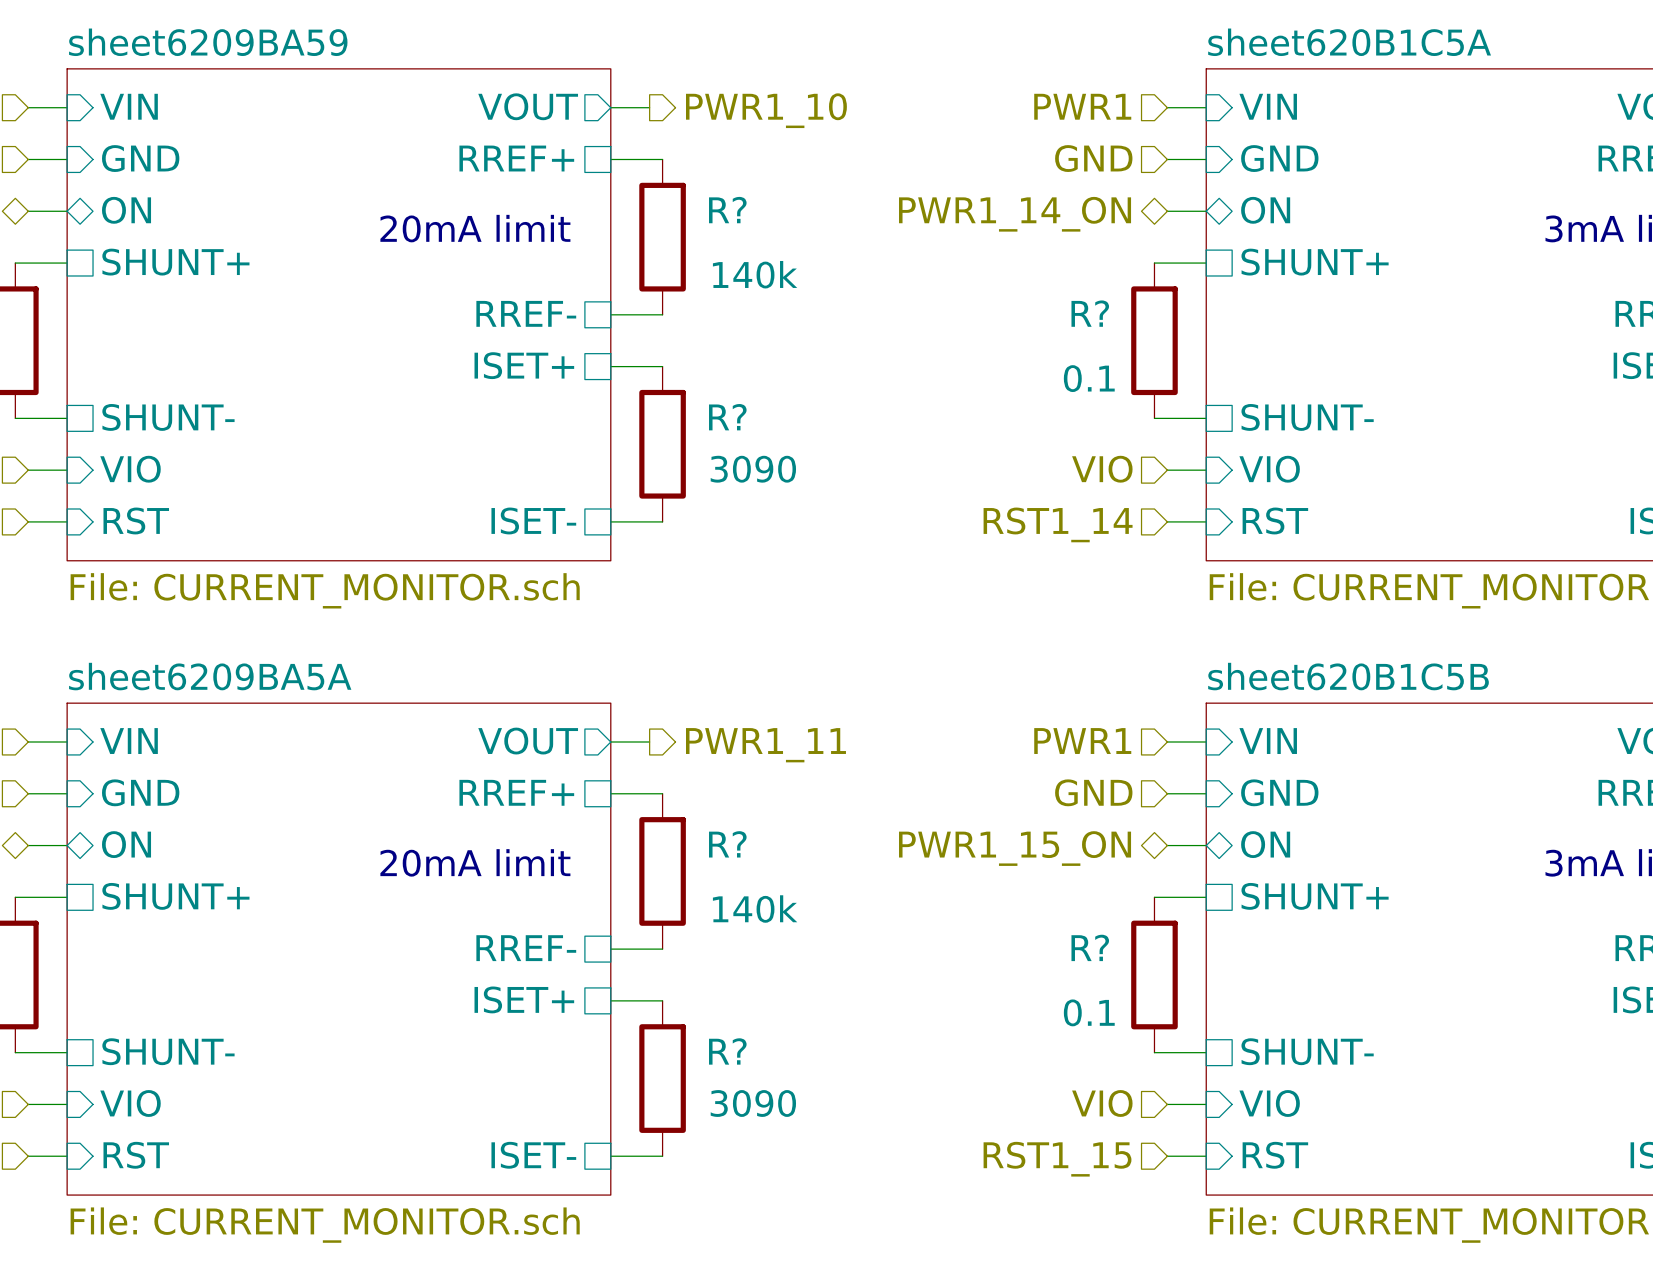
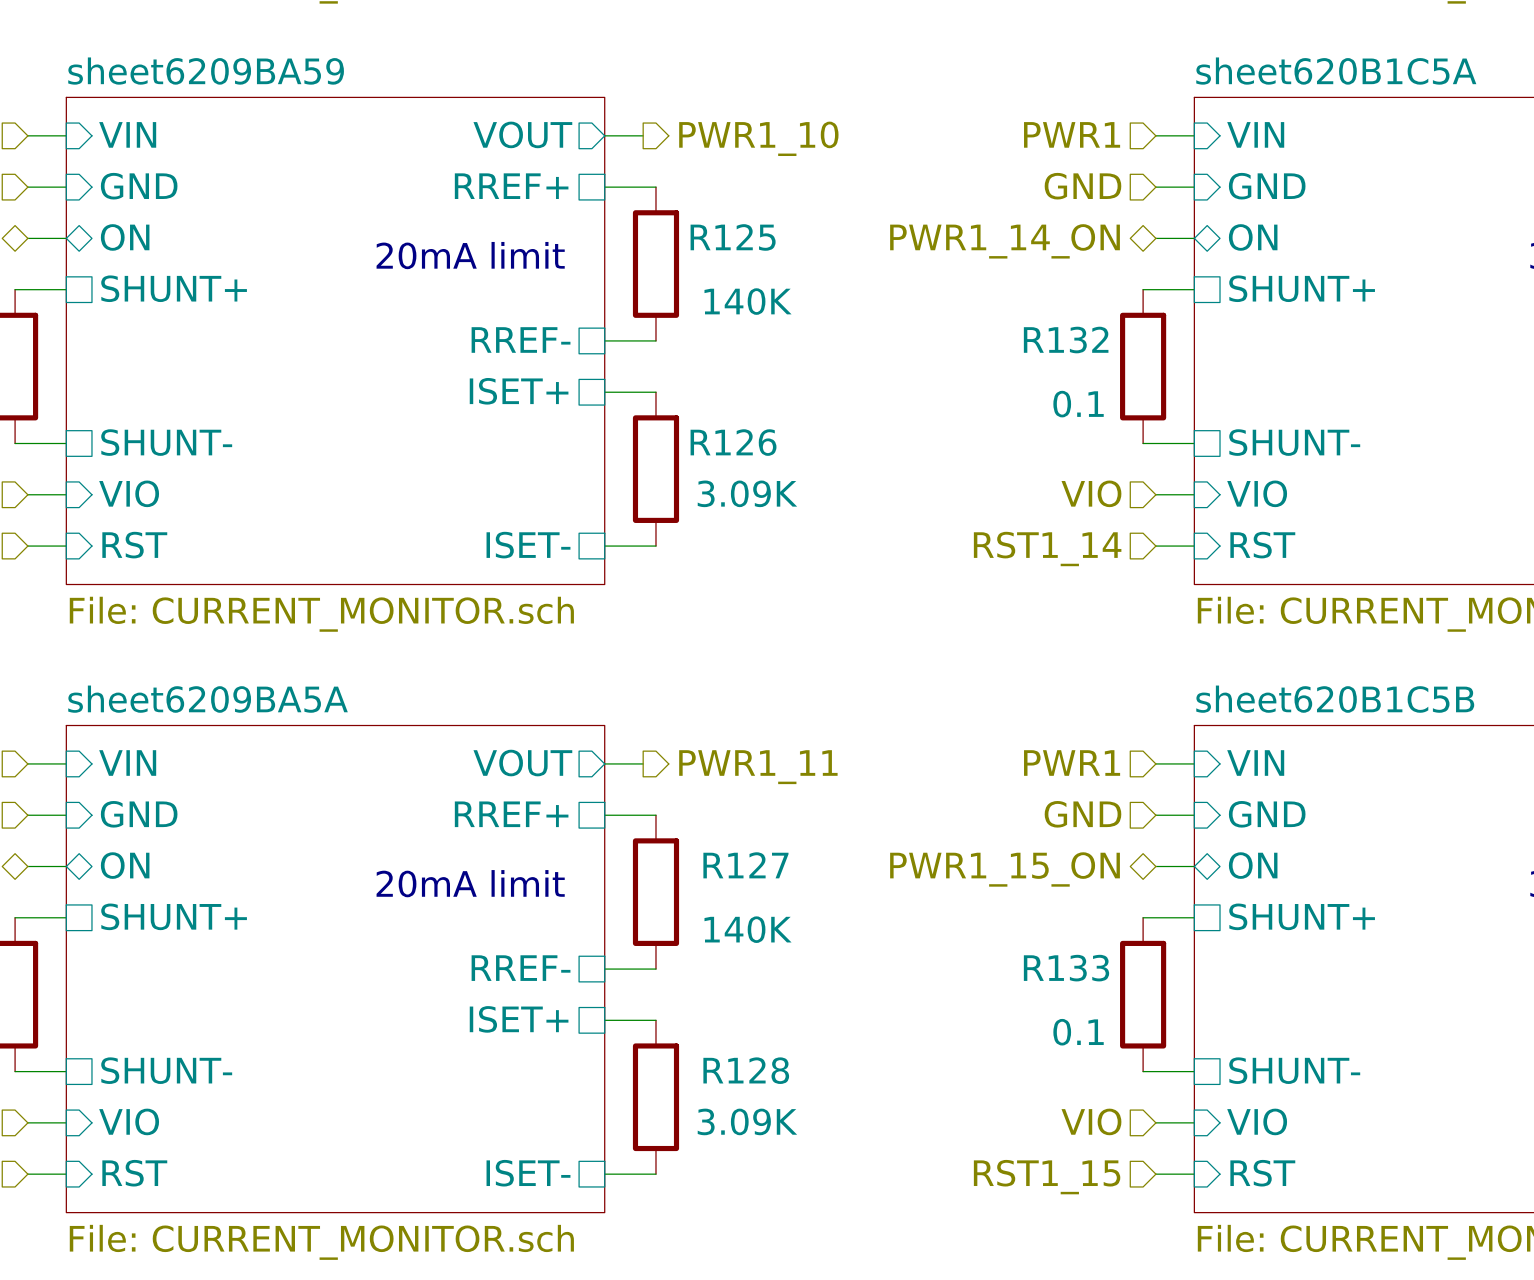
R? name: R? (727, 210) -> R125 (733, 237)
R? value: 140k (755, 274) -> 140K (748, 301)
R? name: R? (1090, 313) -> R132 (1066, 340)
R? name: R? (727, 417) -> R126 (733, 442)
R? value: 3090 (753, 469) -> 3.09K (747, 493)
R? name: R? (727, 844) -> R127 (745, 865)
R? value: 140k (755, 909) -> 140K (748, 929)
R? name: R? (1090, 947) -> R133 (1066, 968)
R? name: R? (727, 1051) -> R128 (746, 1070)
R? value: 3090 (753, 1103) -> 3.09K (747, 1121)

